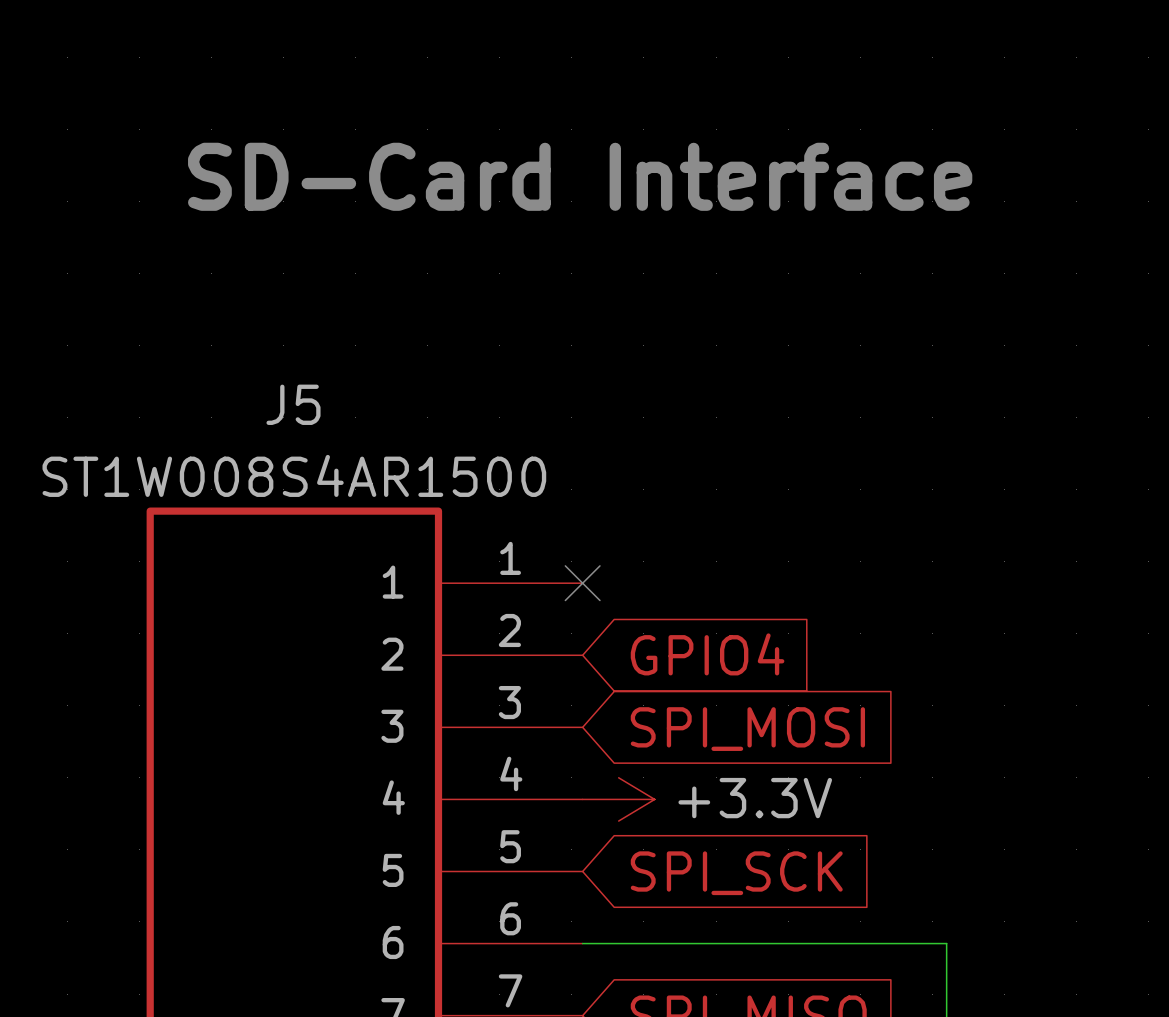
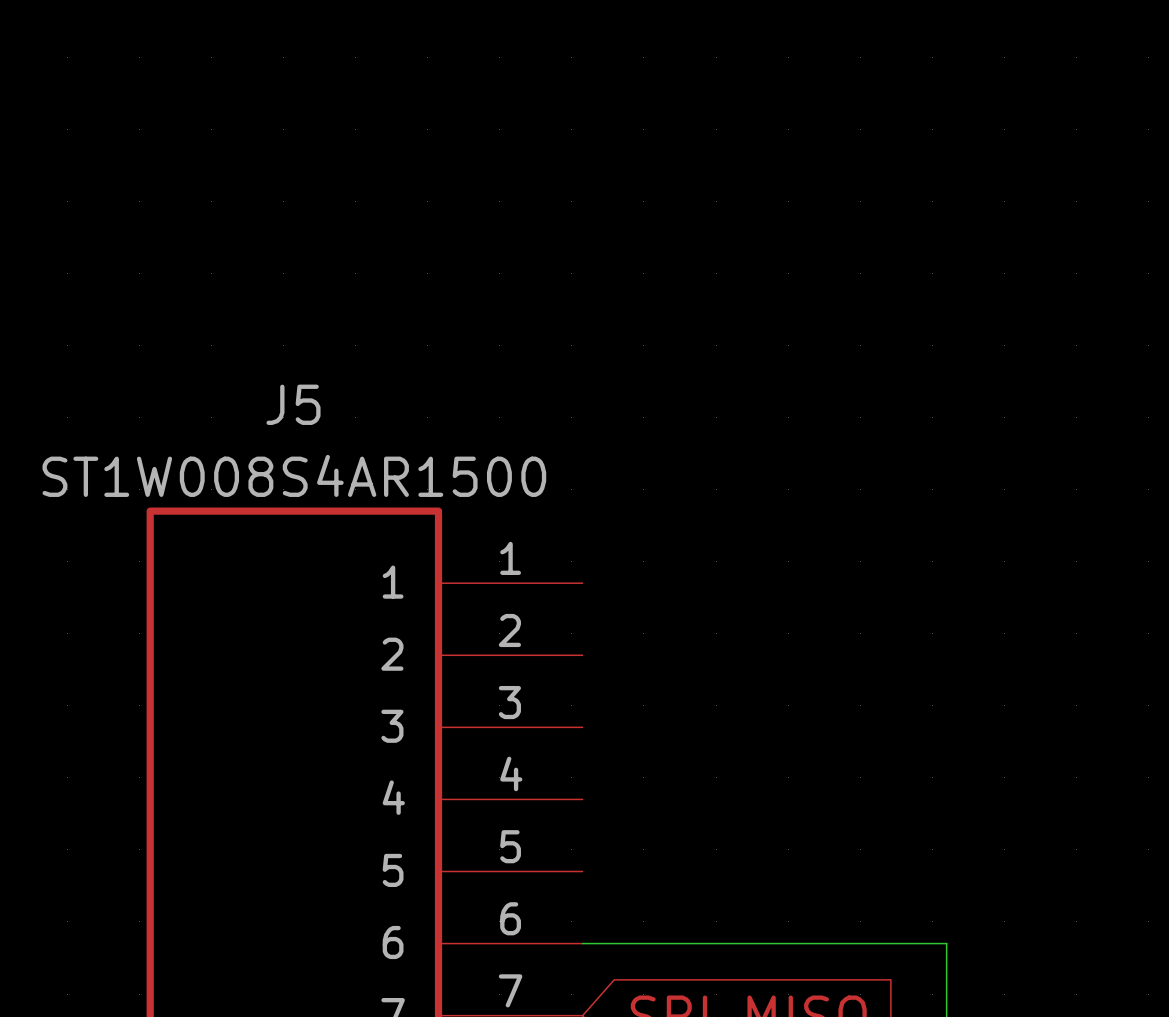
text: SD-Card Interface (580, 176) -> none
no-connect mark: (582, 583) -> none
global label: GPIO4 (707, 654) -> none
global label: SPI_MOSI (747, 729) -> none
power symbol: +3.3V (618, 799) -> none
global label: SPI_SCK (736, 873) -> none

